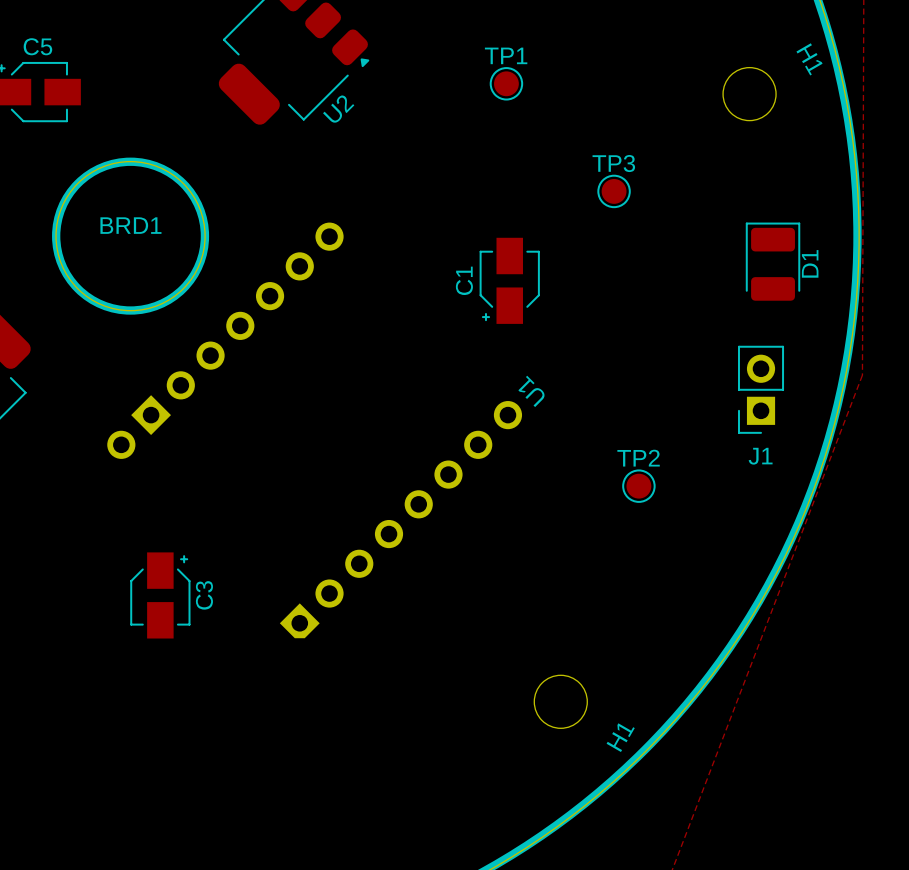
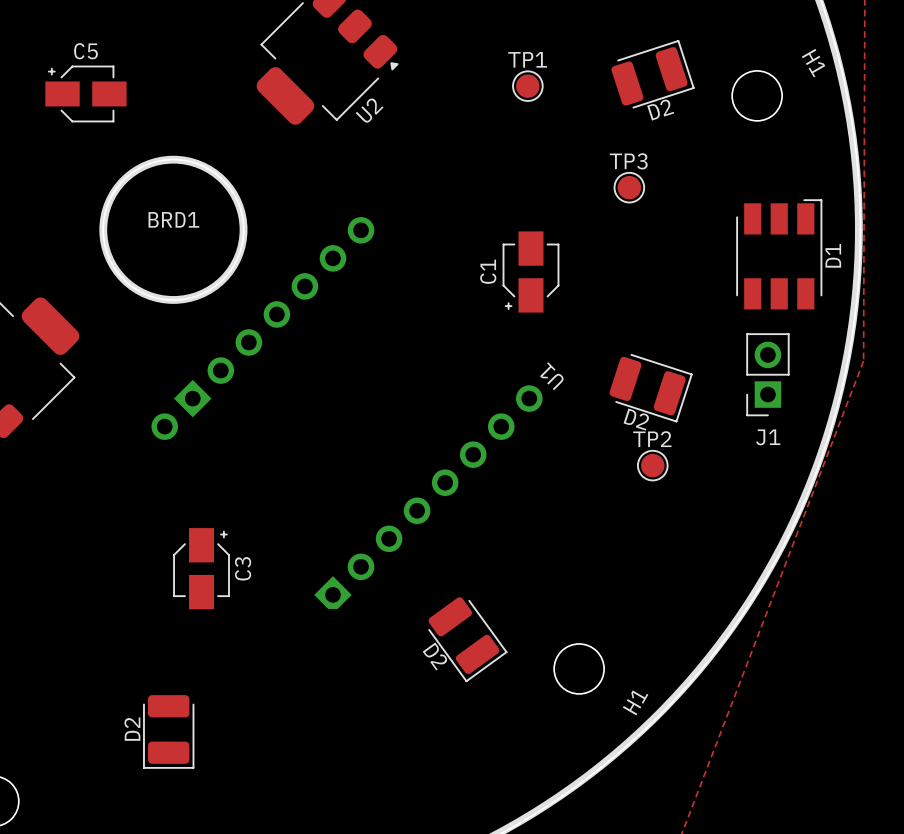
D2: none -> (653, 74)
D1 footprint: [745, 222, 801, 301] -> [736, 199, 823, 310]
D2: none -> (651, 388)
D2: none -> (467, 639)
D2: none -> (168, 731)

